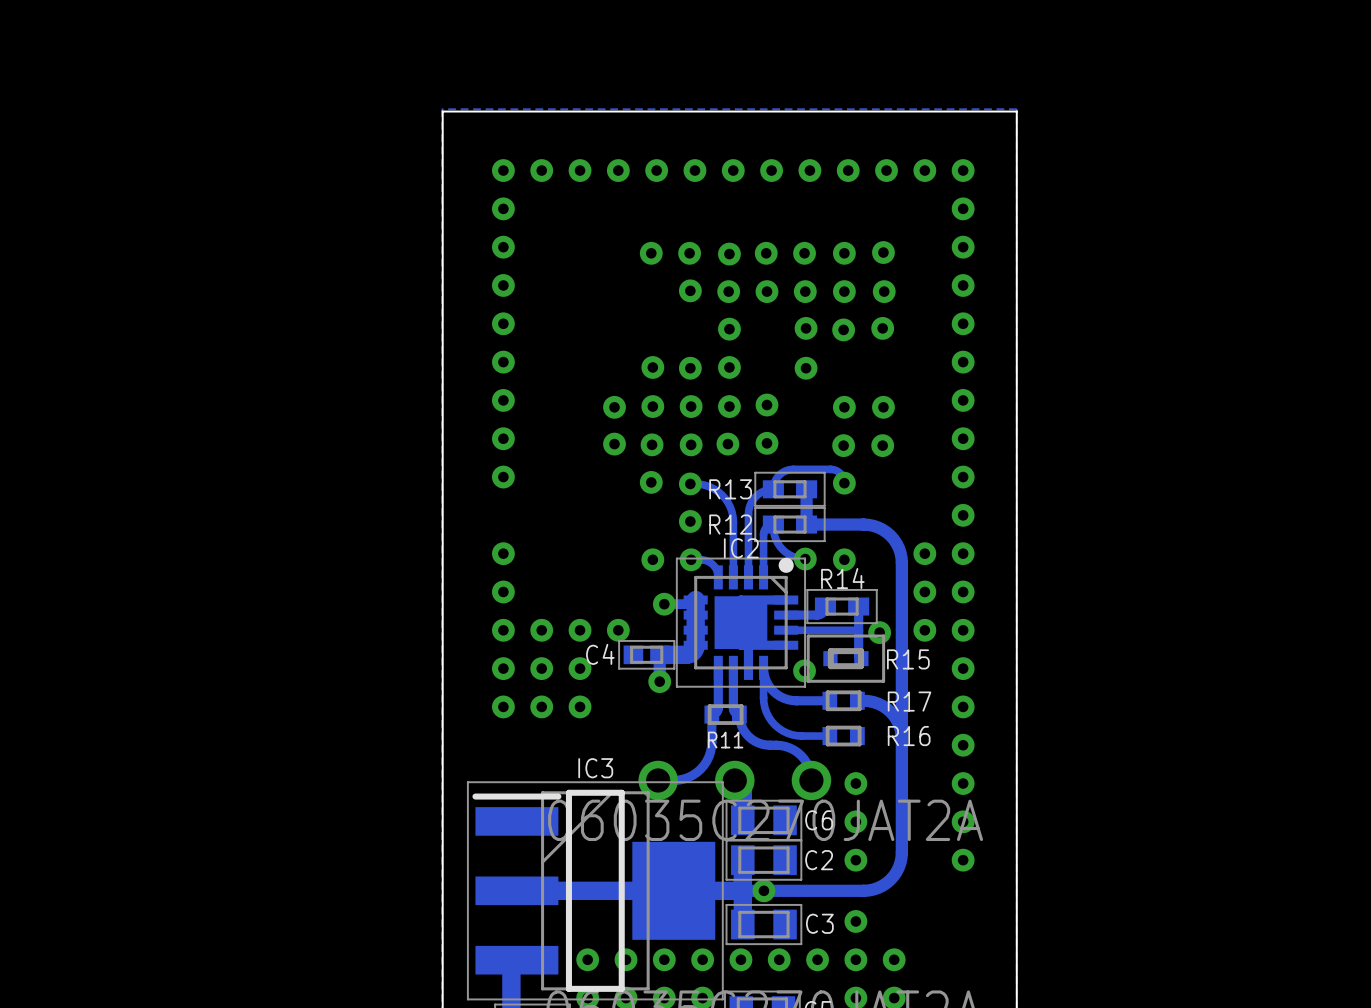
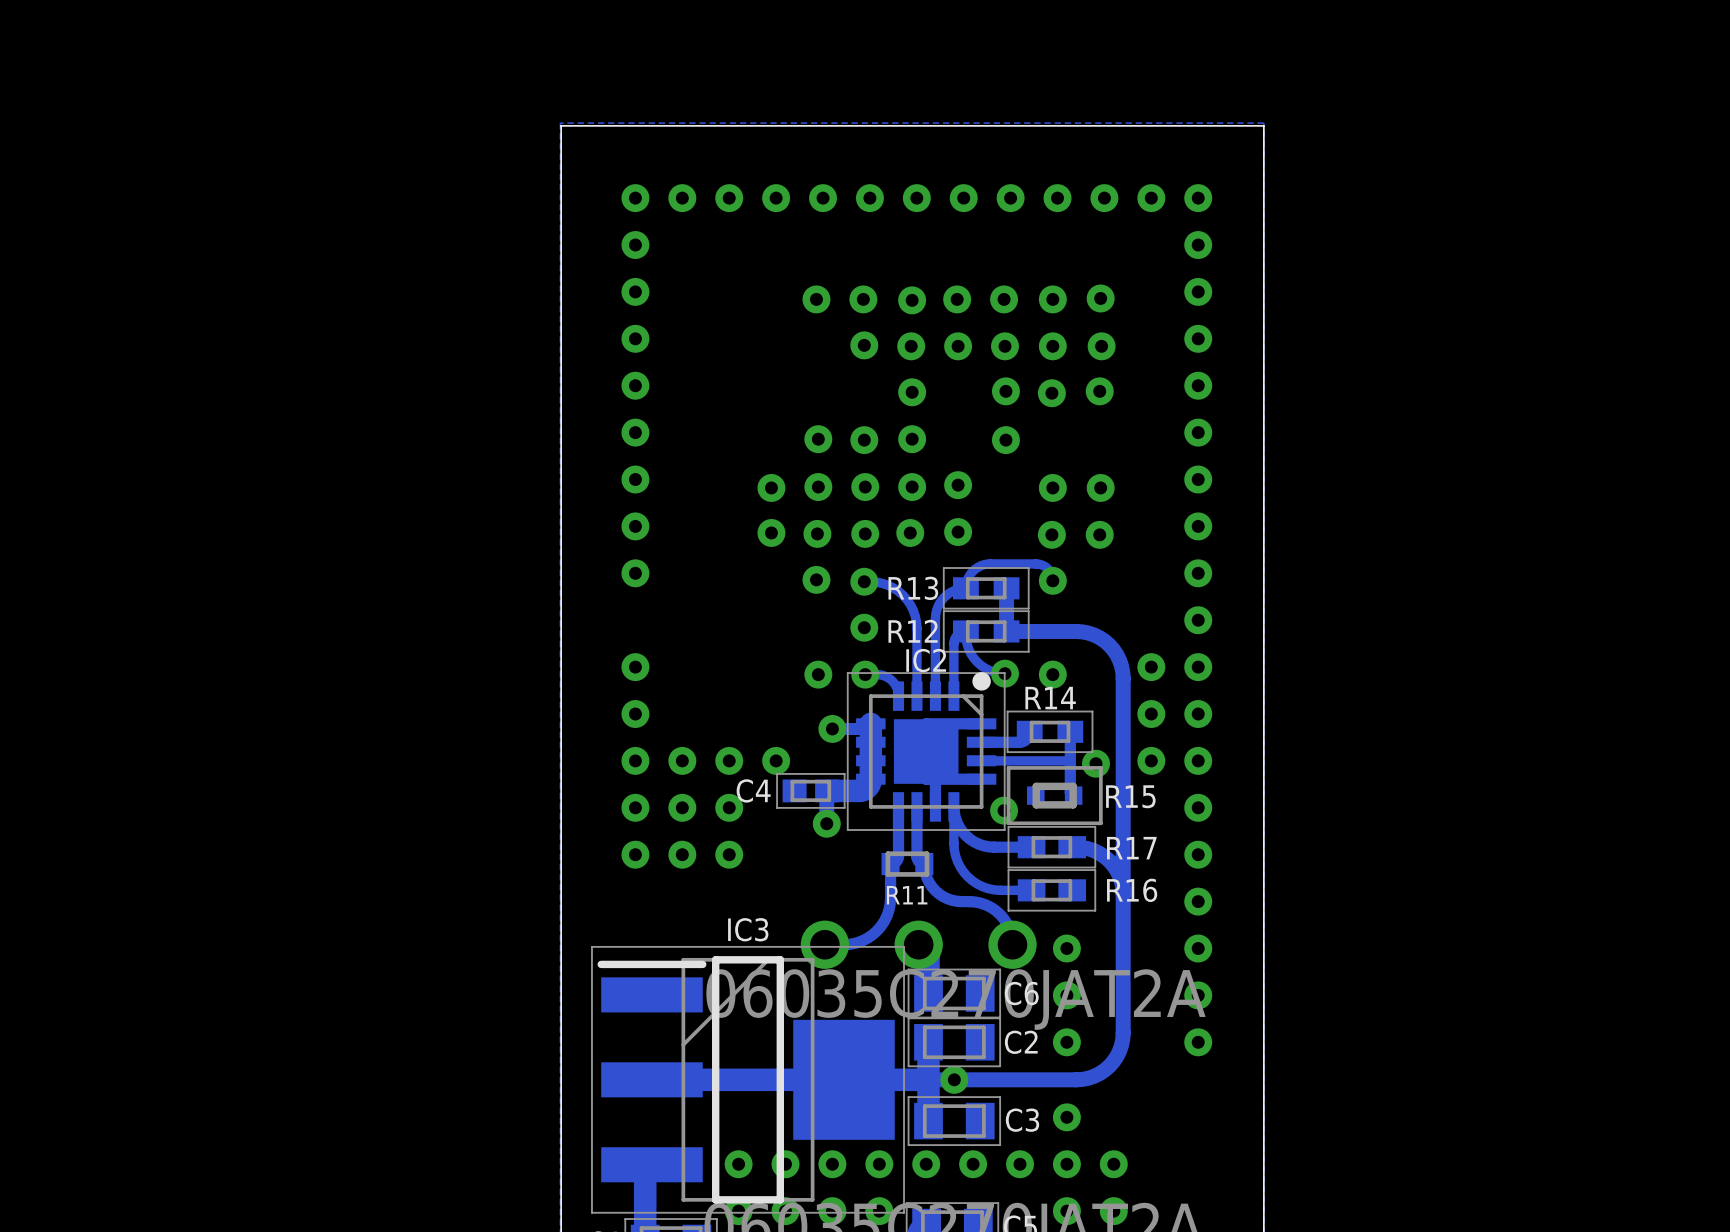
R17 footprint: [822, 690, 865, 712] -> [1007, 825, 1097, 869]
R16 footprint: [822, 725, 865, 747] -> [1007, 869, 1097, 912]

